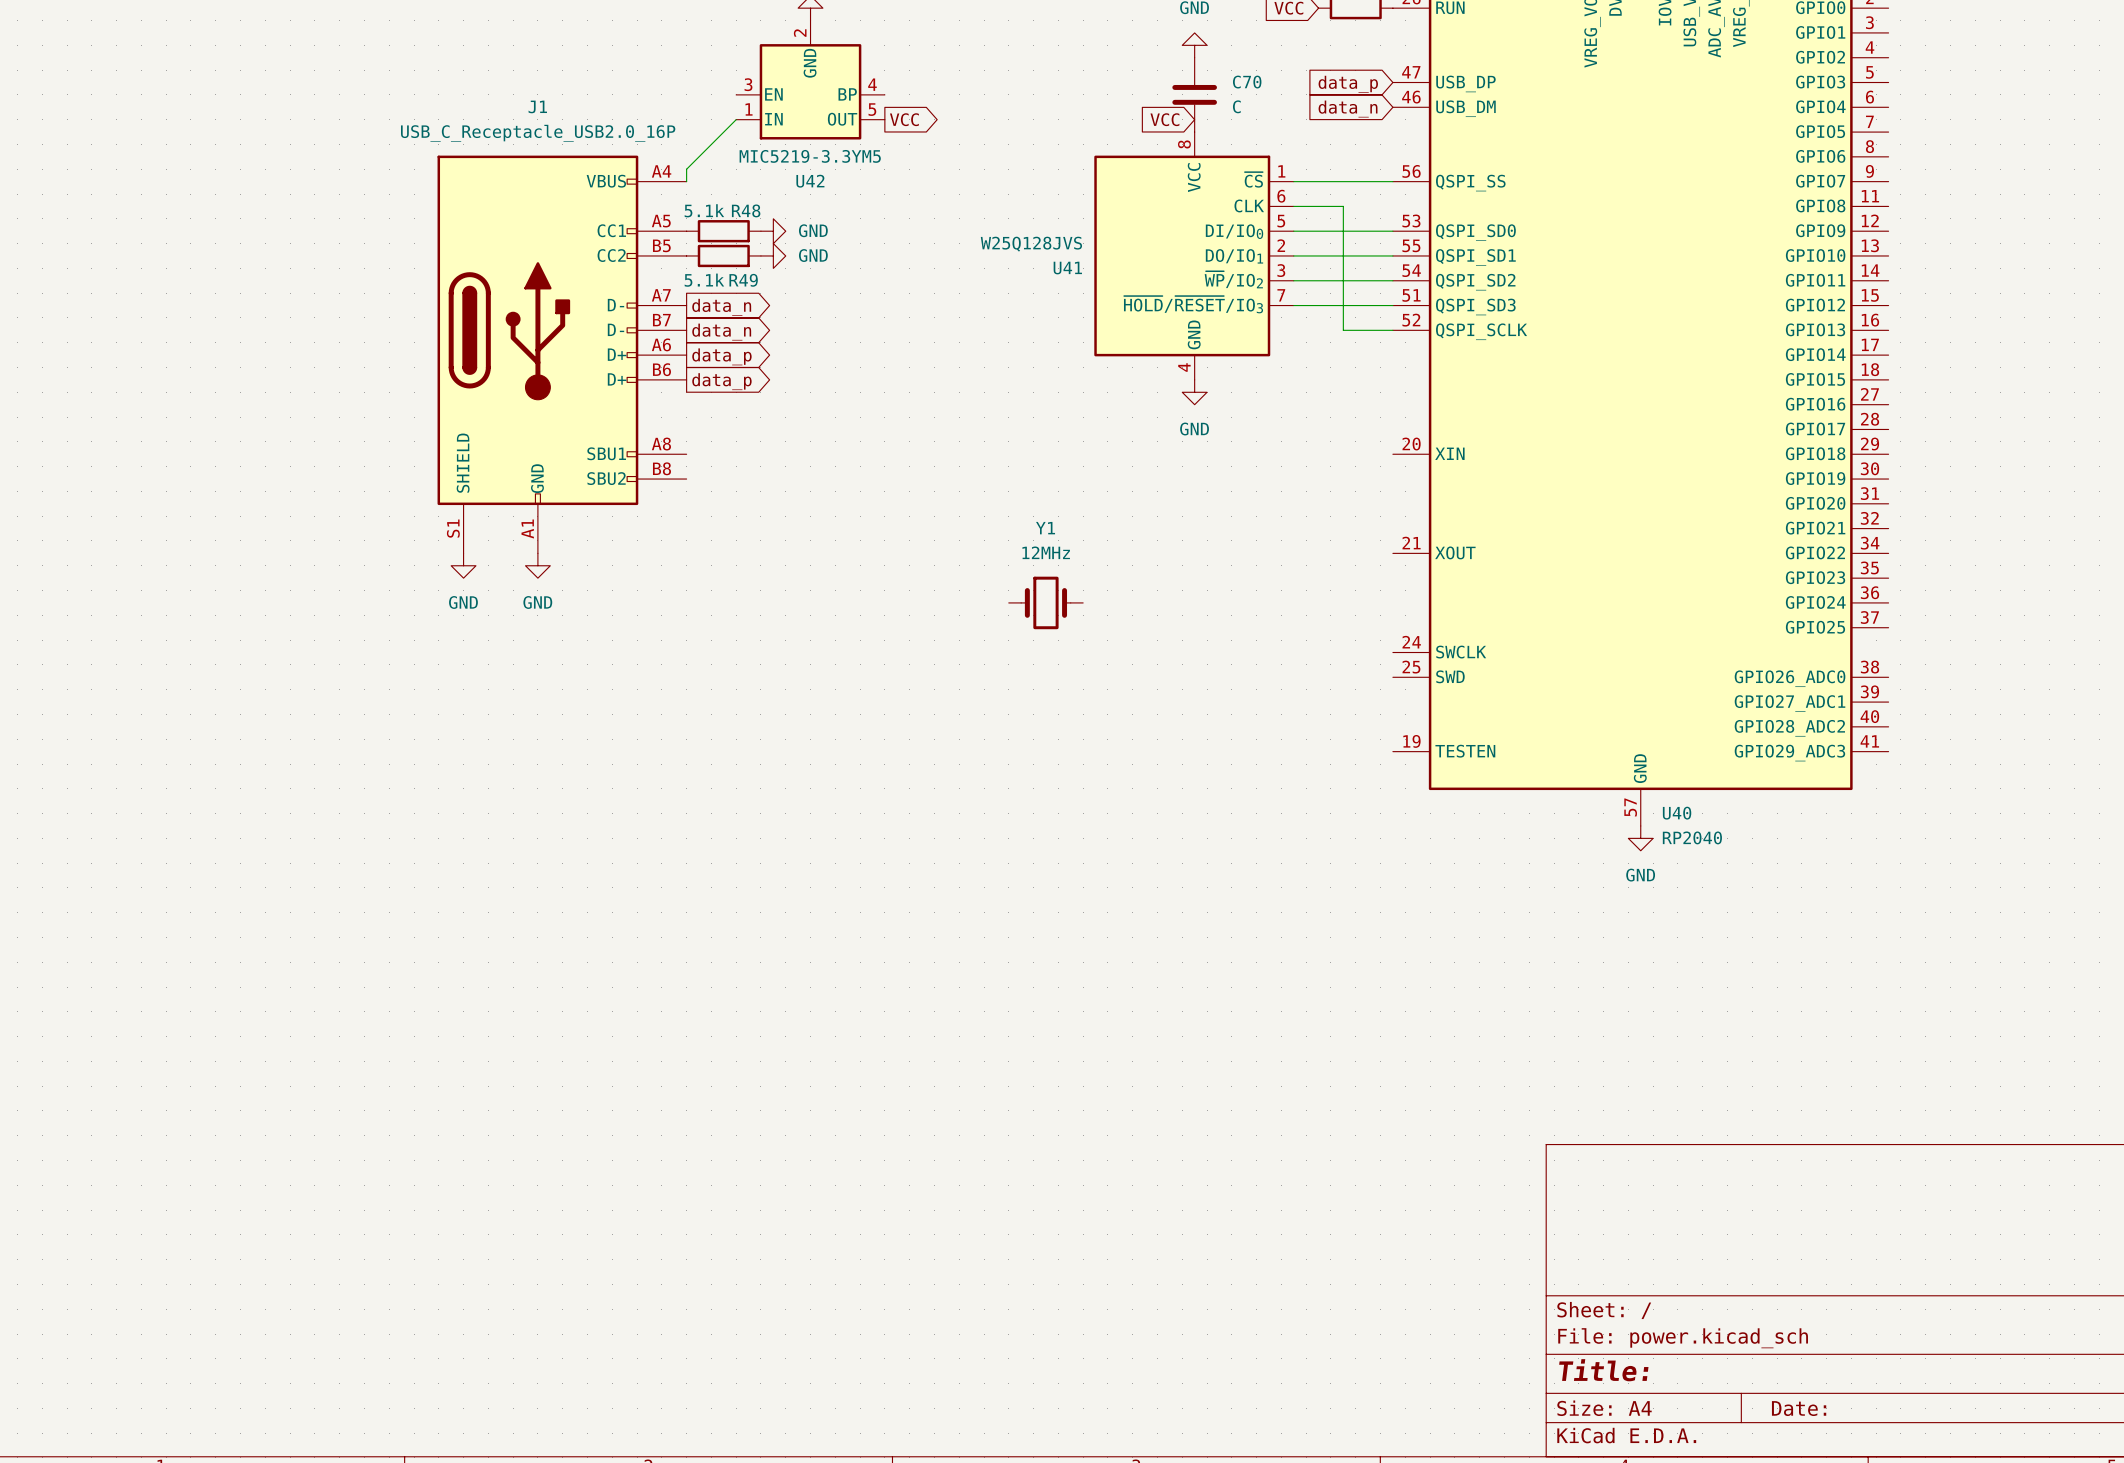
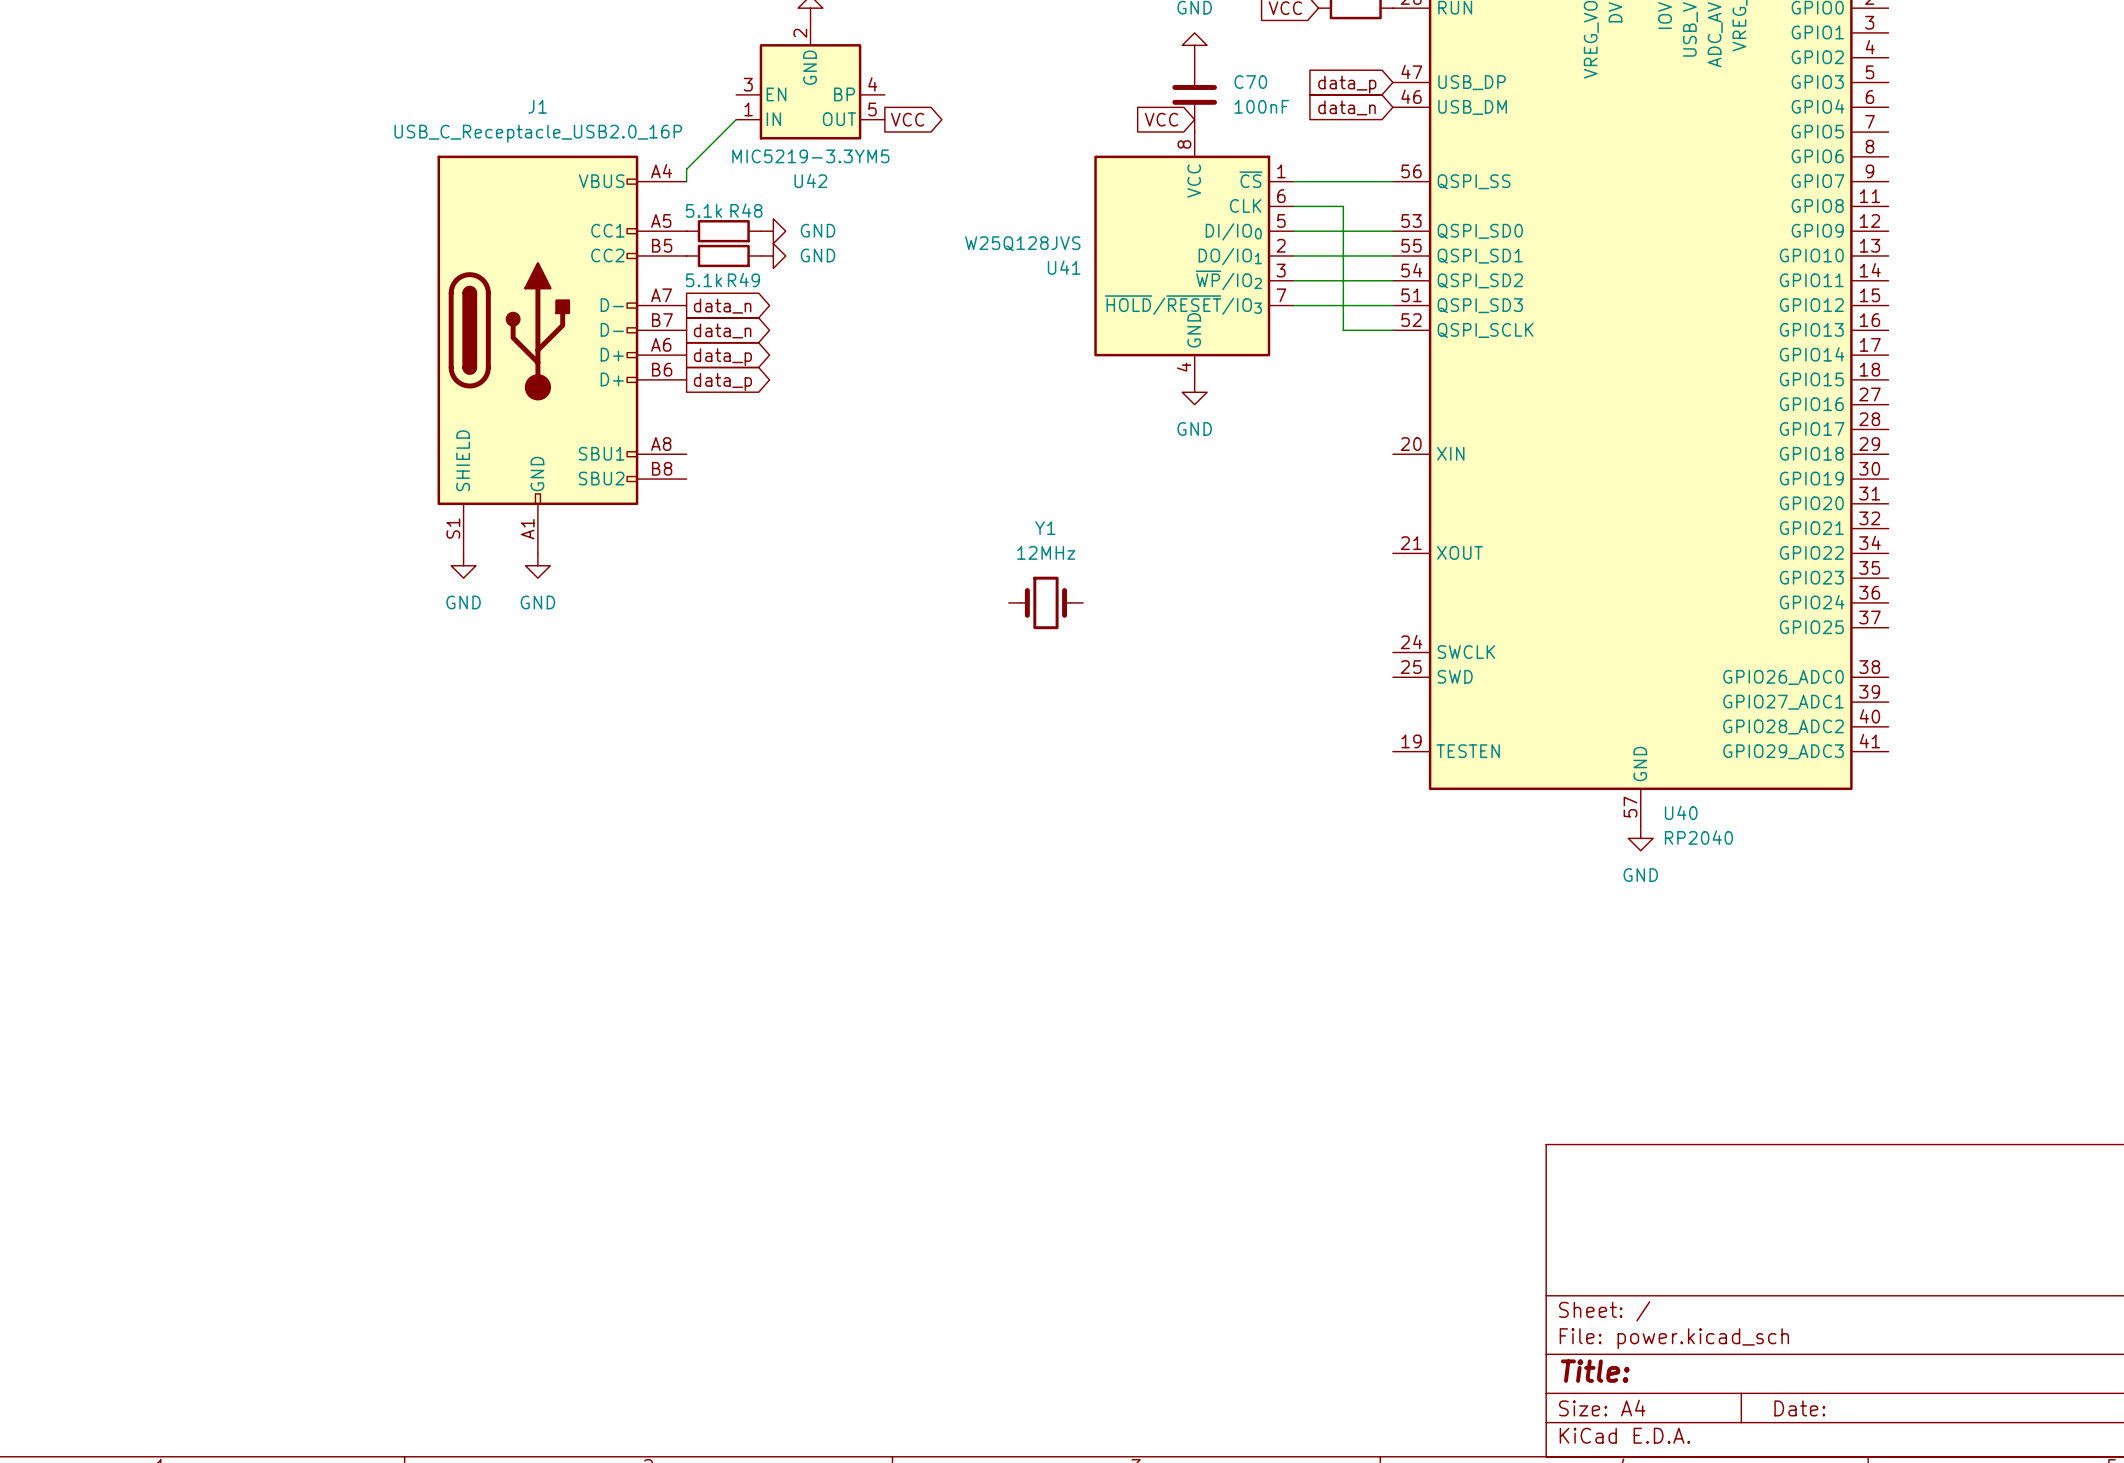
C70 value: C (1236, 106) -> 100nF (1261, 106)

